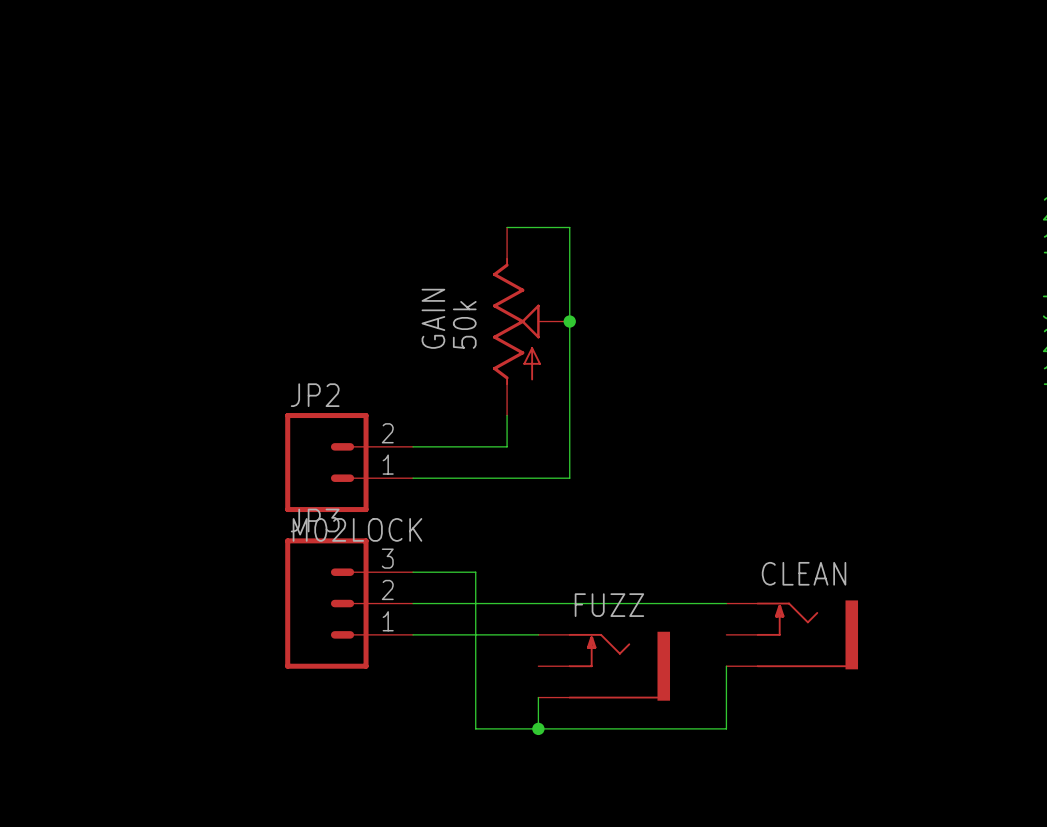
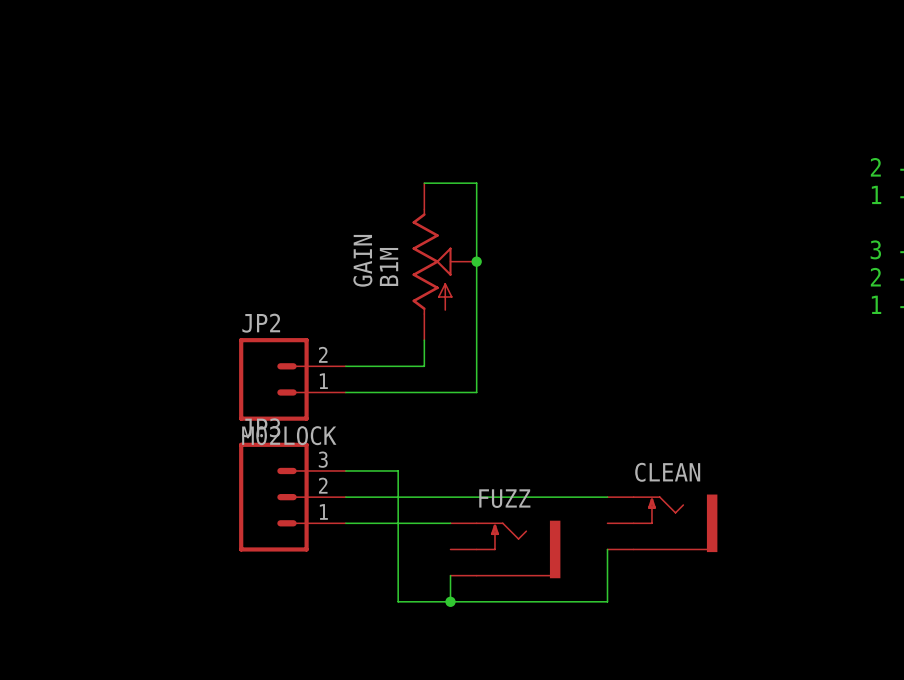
GAIN value: 50k (464, 324) -> B1M (389, 266)

